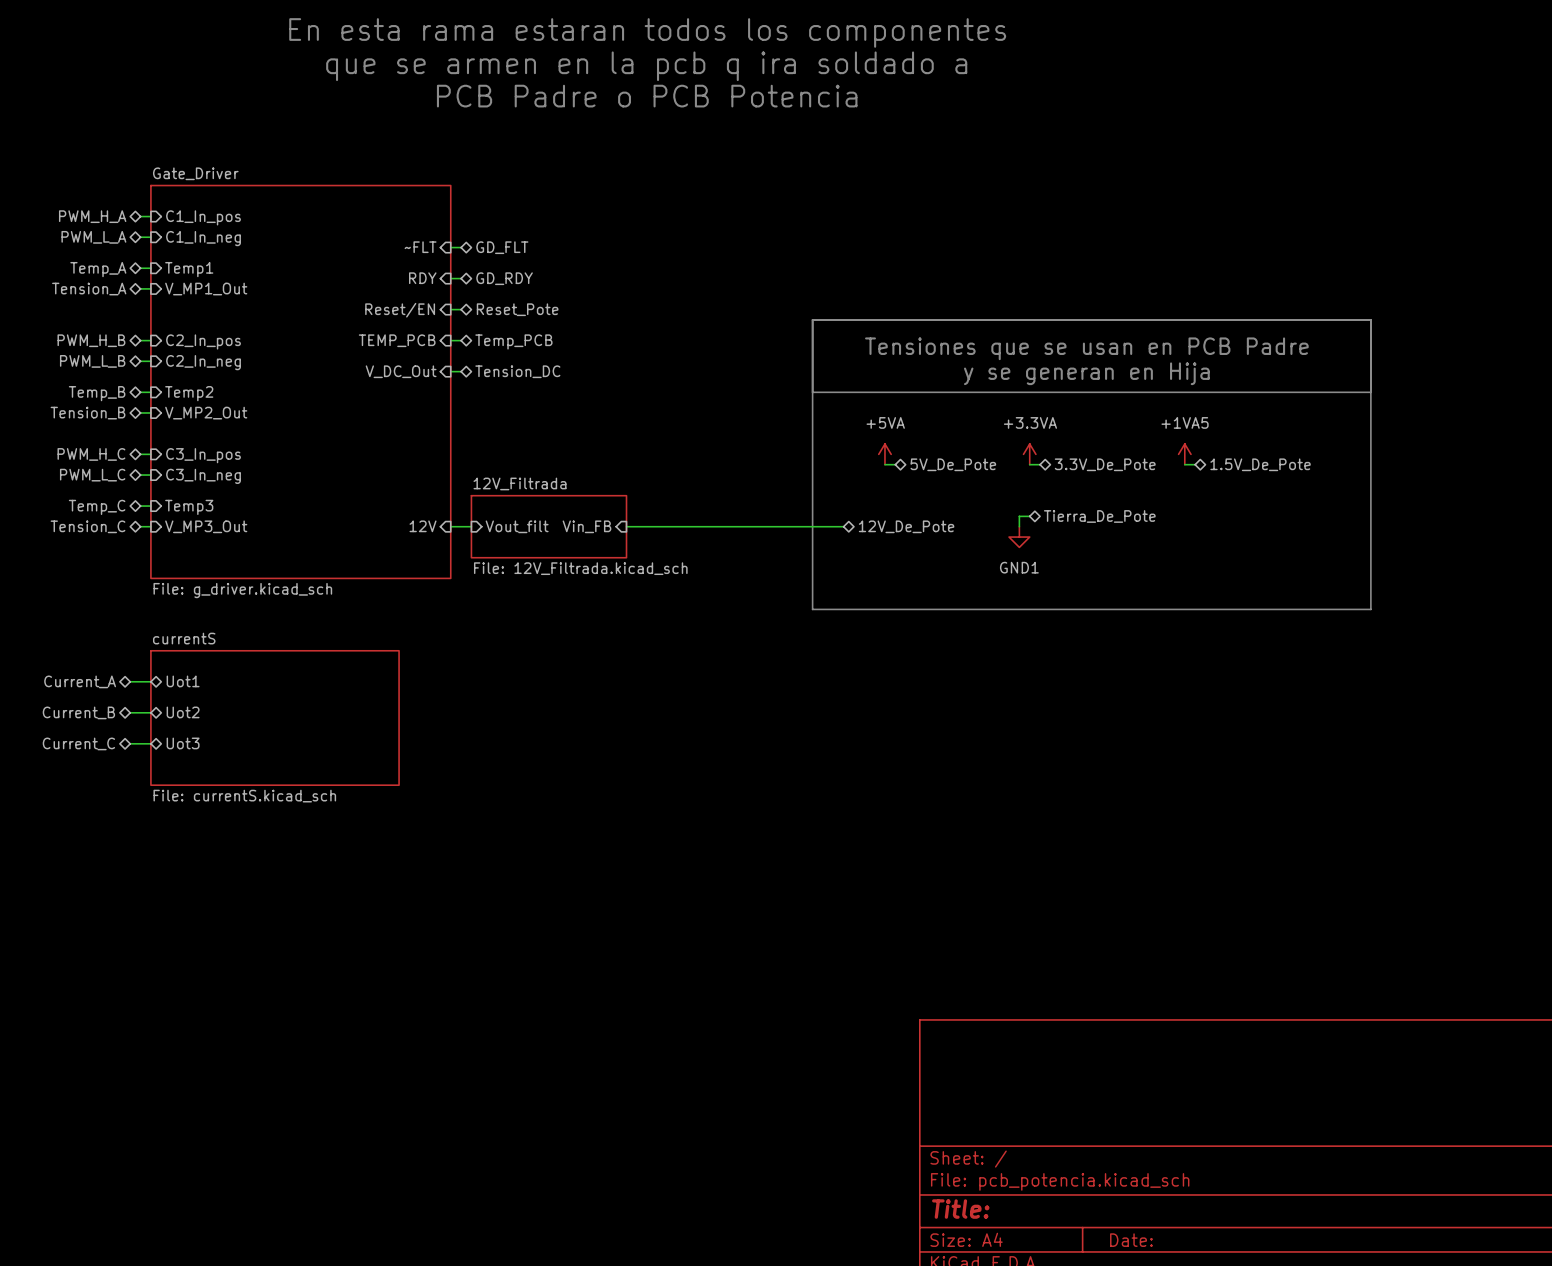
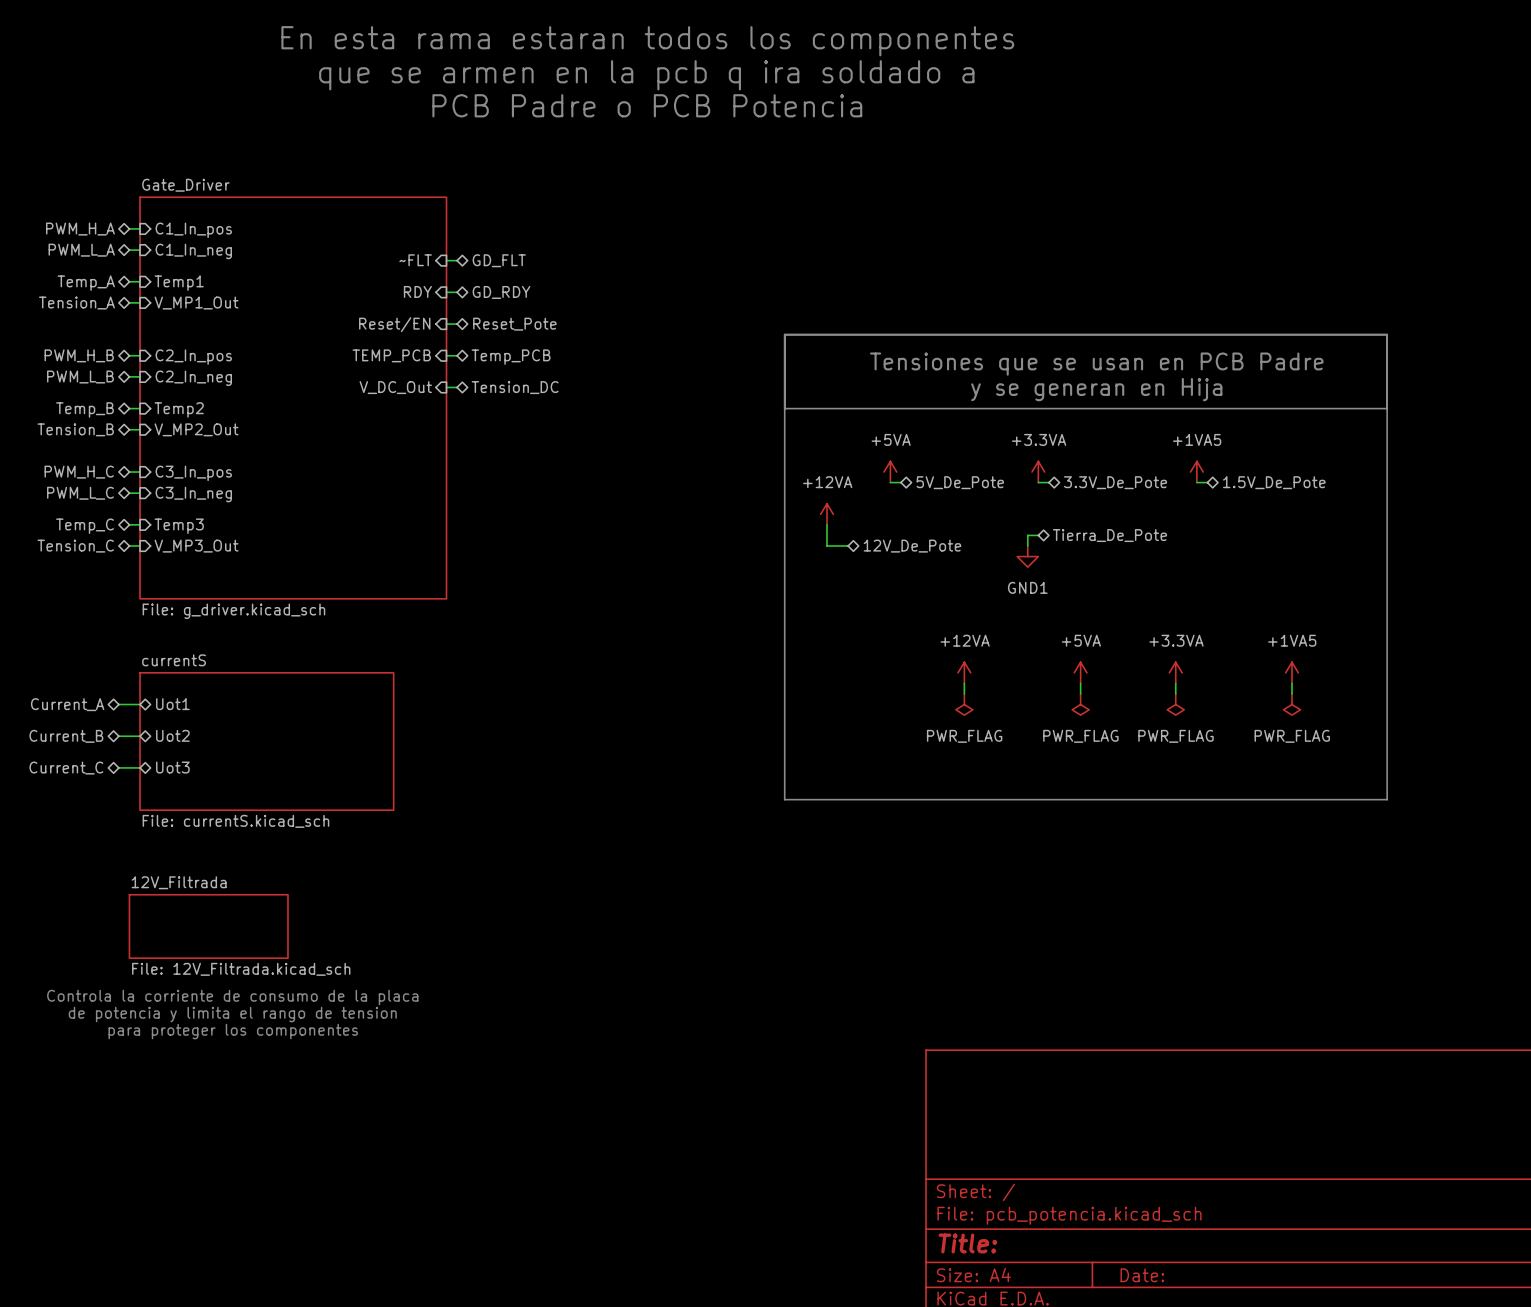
line: (812, 319) (812, 609) (1370, 609) -> (816, 334) (784, 334) (784, 799) (1387, 799) (1387, 630)
line: none -> (784, 408) (816, 408)
power symbol: none -> +12VA (826, 514)
sheet pin: 12V (423, 526) -> none
wire: (450, 526) (471, 526) -> none
sheet pin: Vout_filt (517, 526) -> none
sheet 12V_Filtrada position: (548, 526) -> (208, 926)
sheet pin: Vin_FB (586, 526) -> none
wire: (626, 526) (822, 526) -> (826, 524) (826, 545)
power symbol: none -> +12VA (964, 672)
power symbol: none -> +5VA (1080, 672)
power symbol: none -> +3.3VA (1175, 672)
power symbol: none -> +1VA5 (1292, 672)
wire: none -> (964, 683) (964, 693)
wire: none -> (1080, 683) (1080, 693)
wire: none -> (1175, 683) (1175, 693)
wire: none -> (1292, 683) (1292, 693)
power symbol: none -> PWR_FLAG (964, 704)
power symbol: none -> PWR_FLAG (1080, 704)
power symbol: none -> PWR_FLAG (1175, 704)
power symbol: none -> PWR_FLAG (1292, 704)
text: none -> Controla la corriente de consumo de la placa (232, 997)
text: none -> de potencia y limita el rango de tension (232, 1014)
text: none -> para proteger los componentes (233, 1031)

